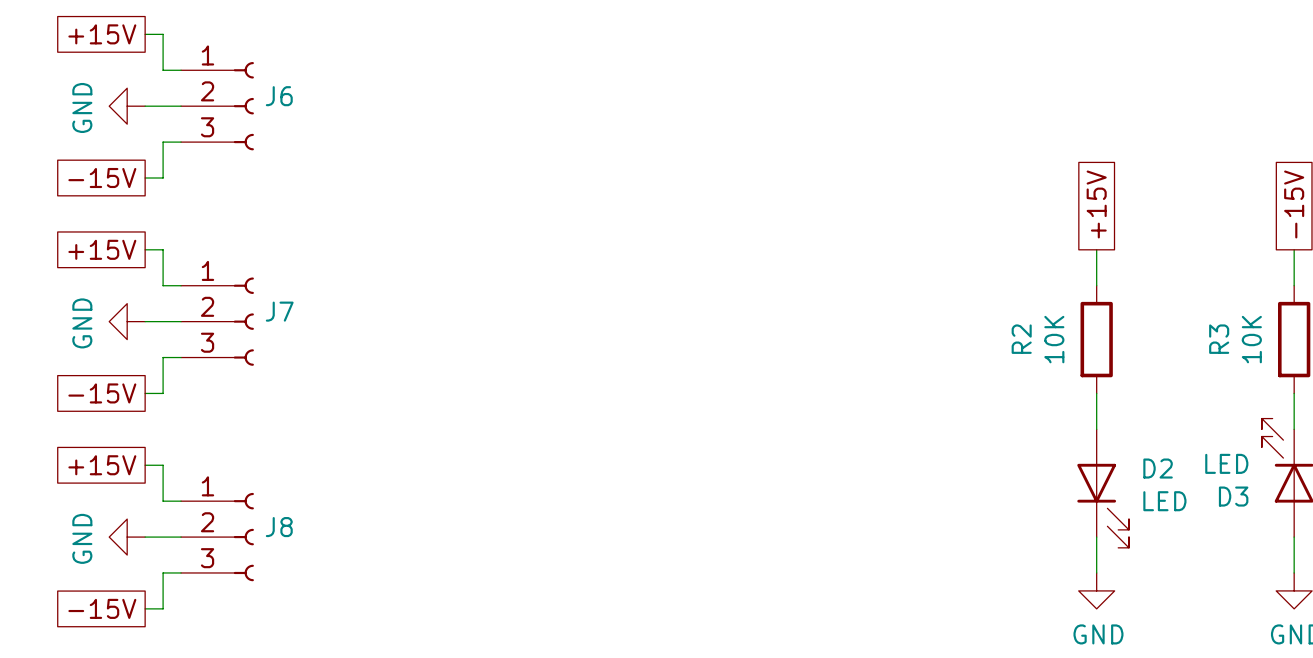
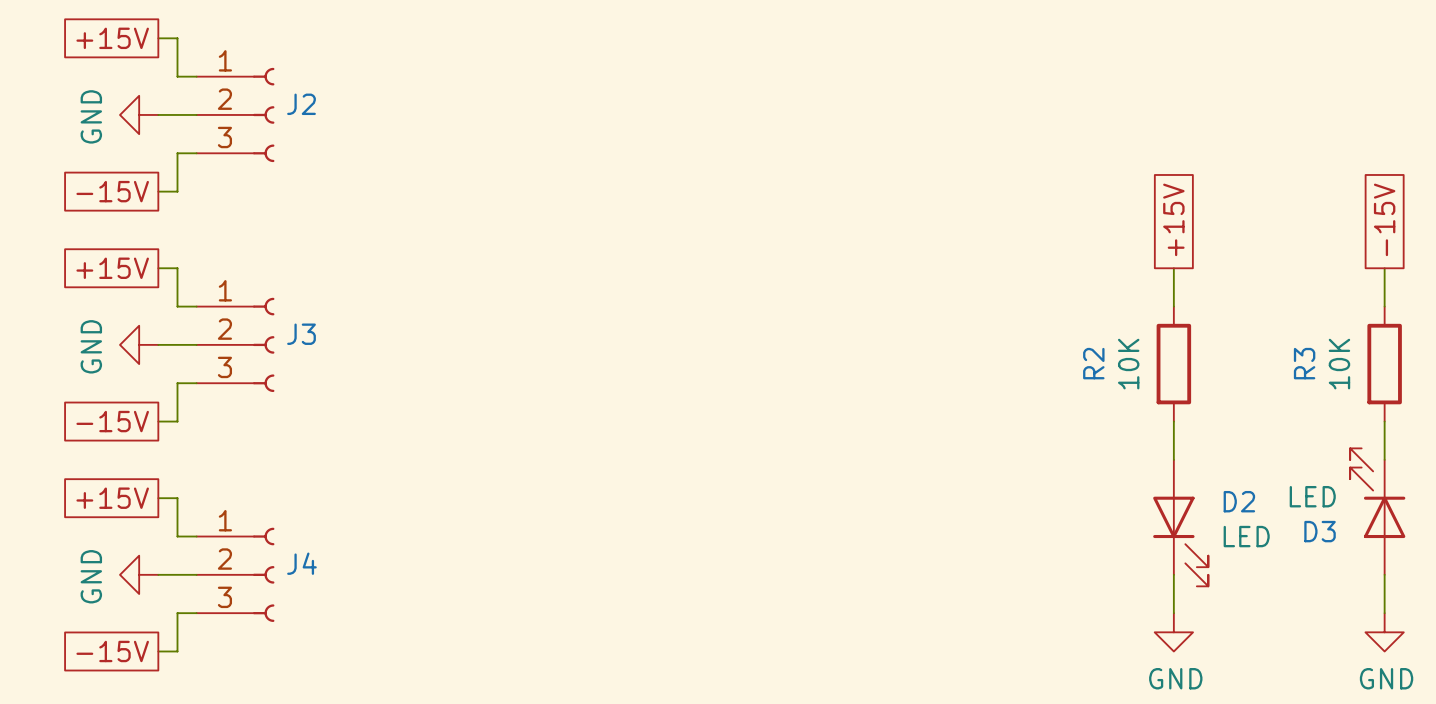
J6 name: J6 (279, 96) -> J2 (301, 104)
J7 name: J7 (279, 311) -> J3 (301, 334)
J8 name: J8 (279, 527) -> J4 (301, 563)

